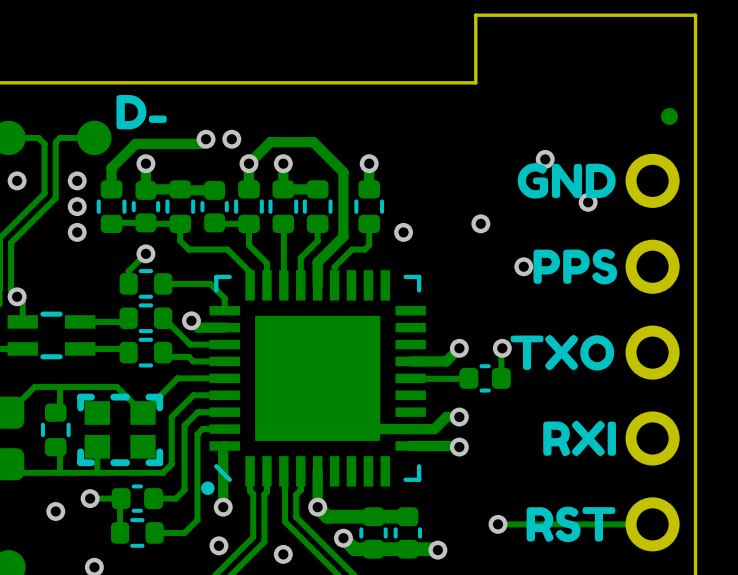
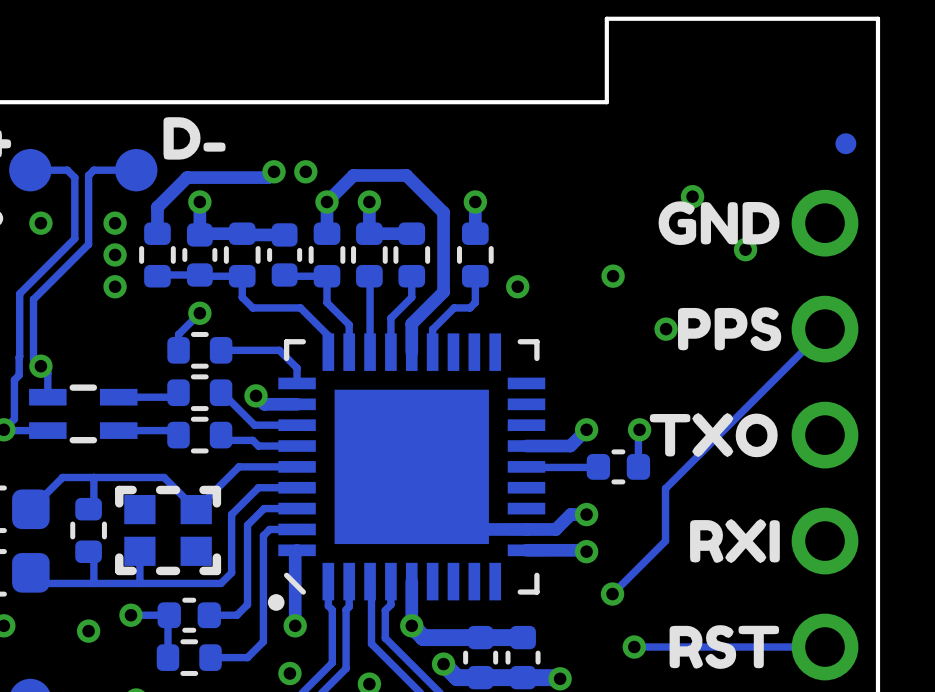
track: none -> (825, 329) (665, 488) (665, 541) (612, 594)
via: none -> (612, 594)

